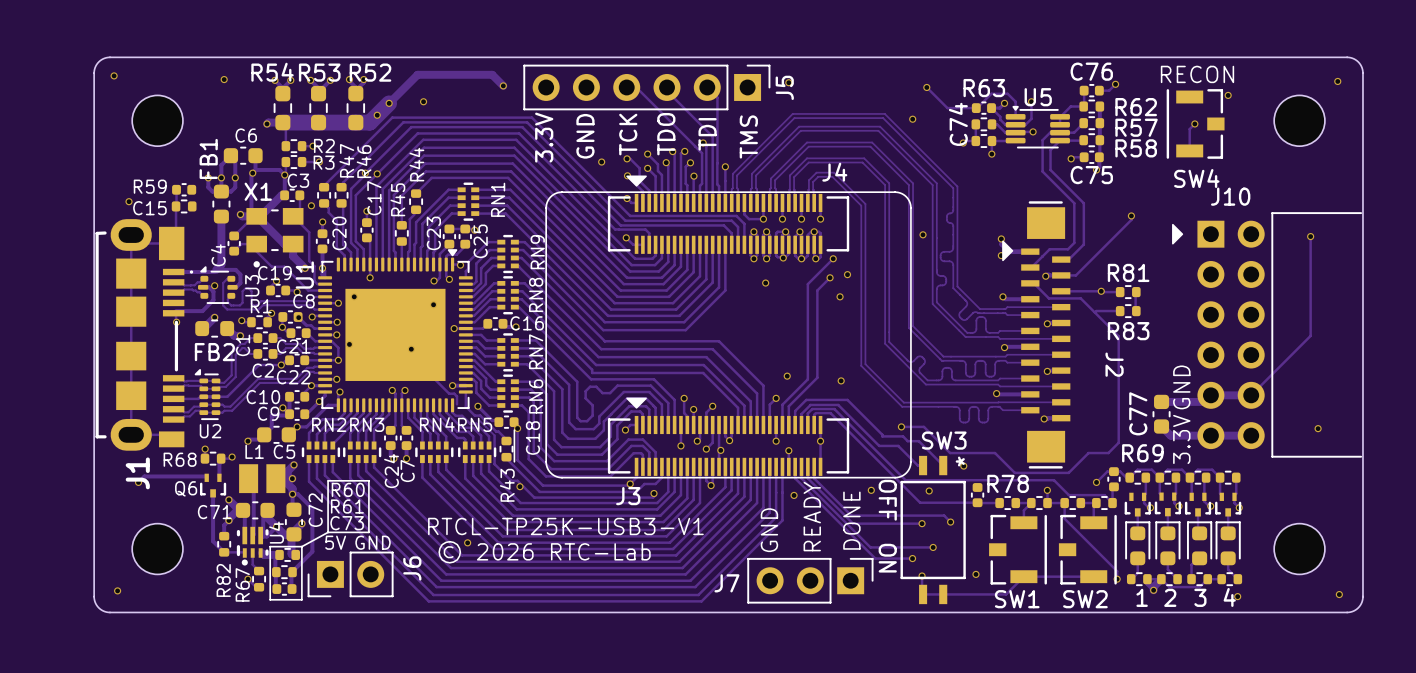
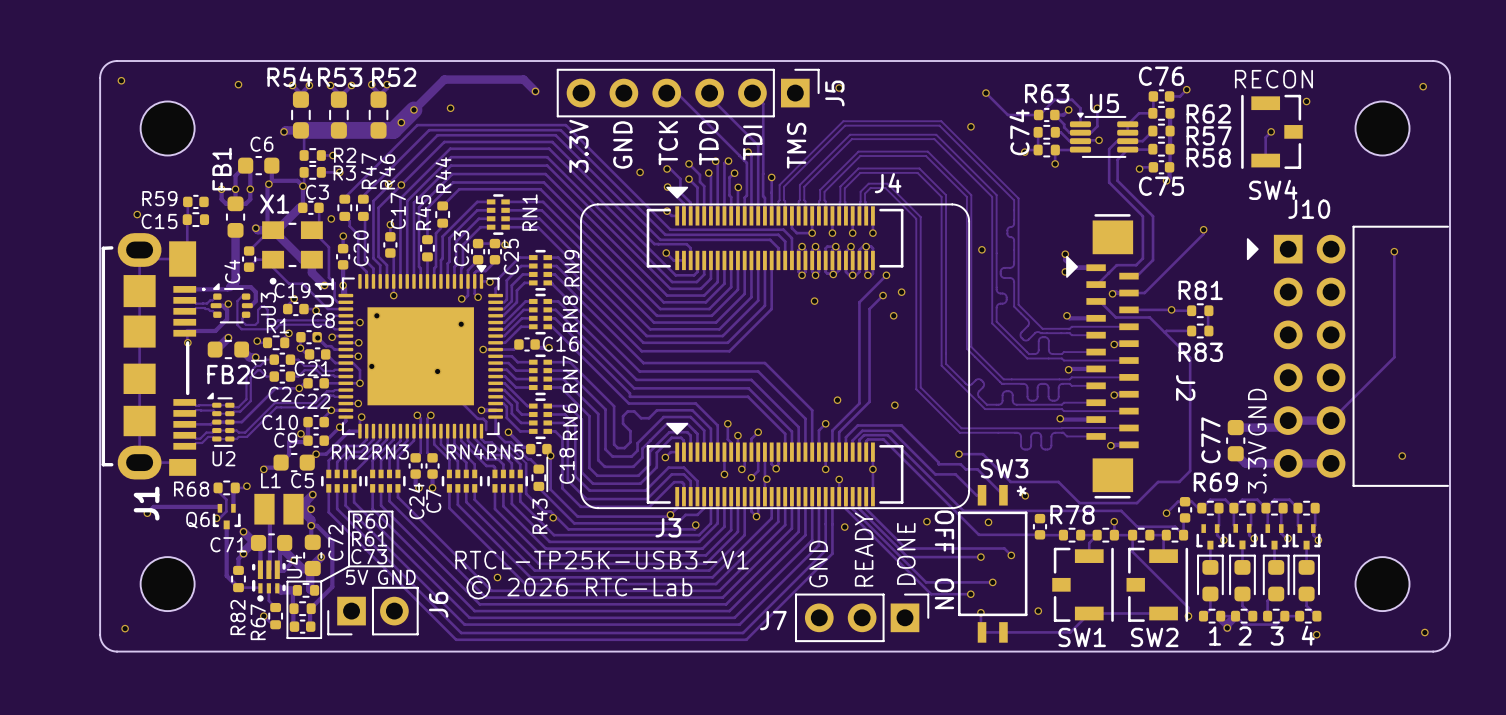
via position: (205, 449) -> (216, 518)
track: none -> (218, 491) (226, 499) (226, 511) (219, 518) (216, 518)

